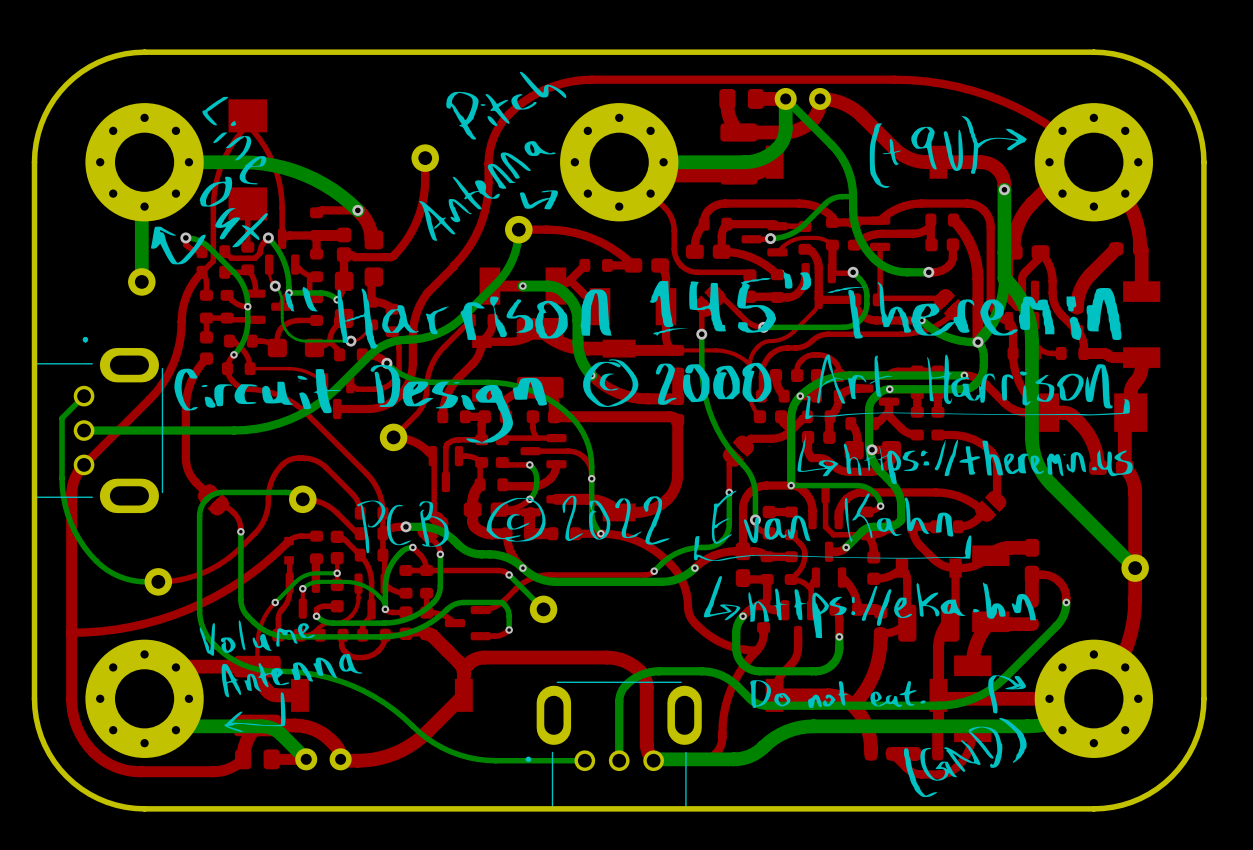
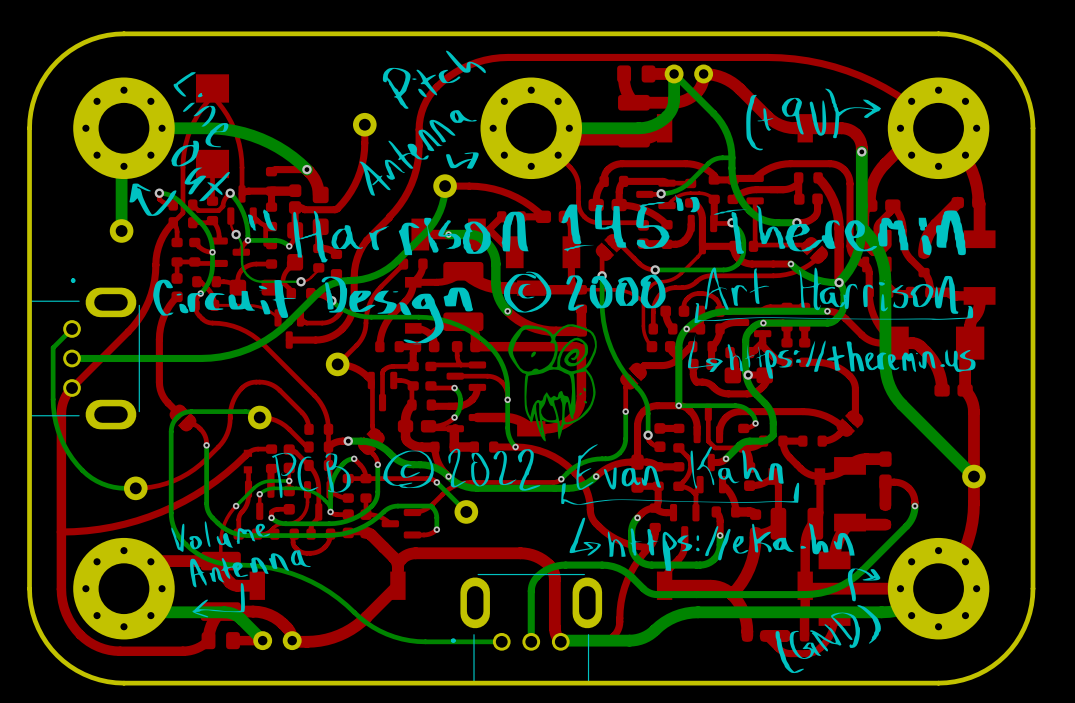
drawing shape: [150, 71, 1133, 798] -> [129, 50, 976, 674]
drawing: none -> [508, 324, 597, 442]

